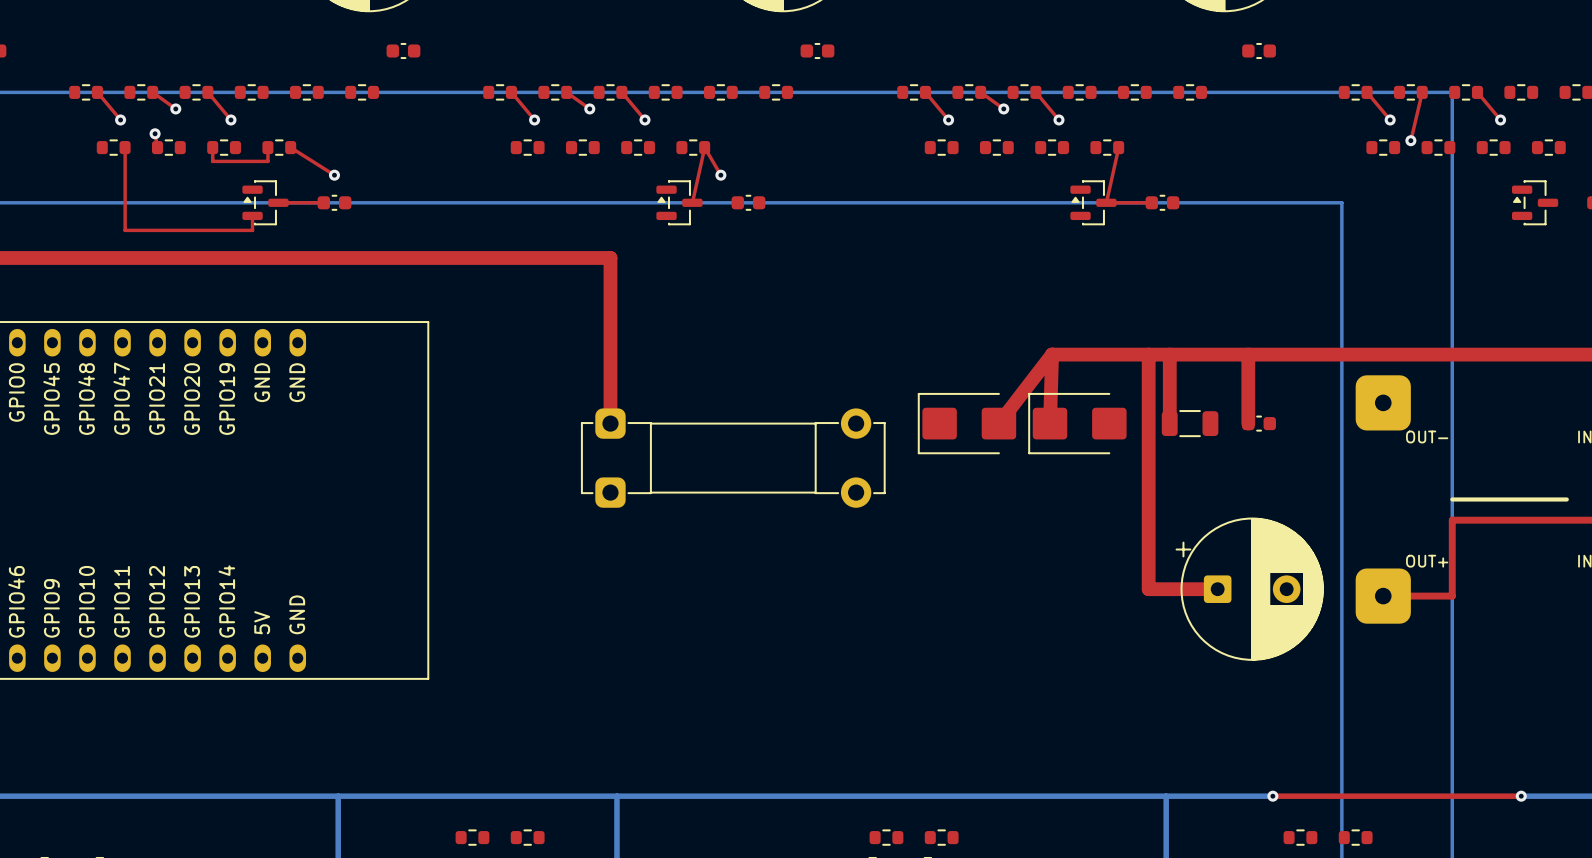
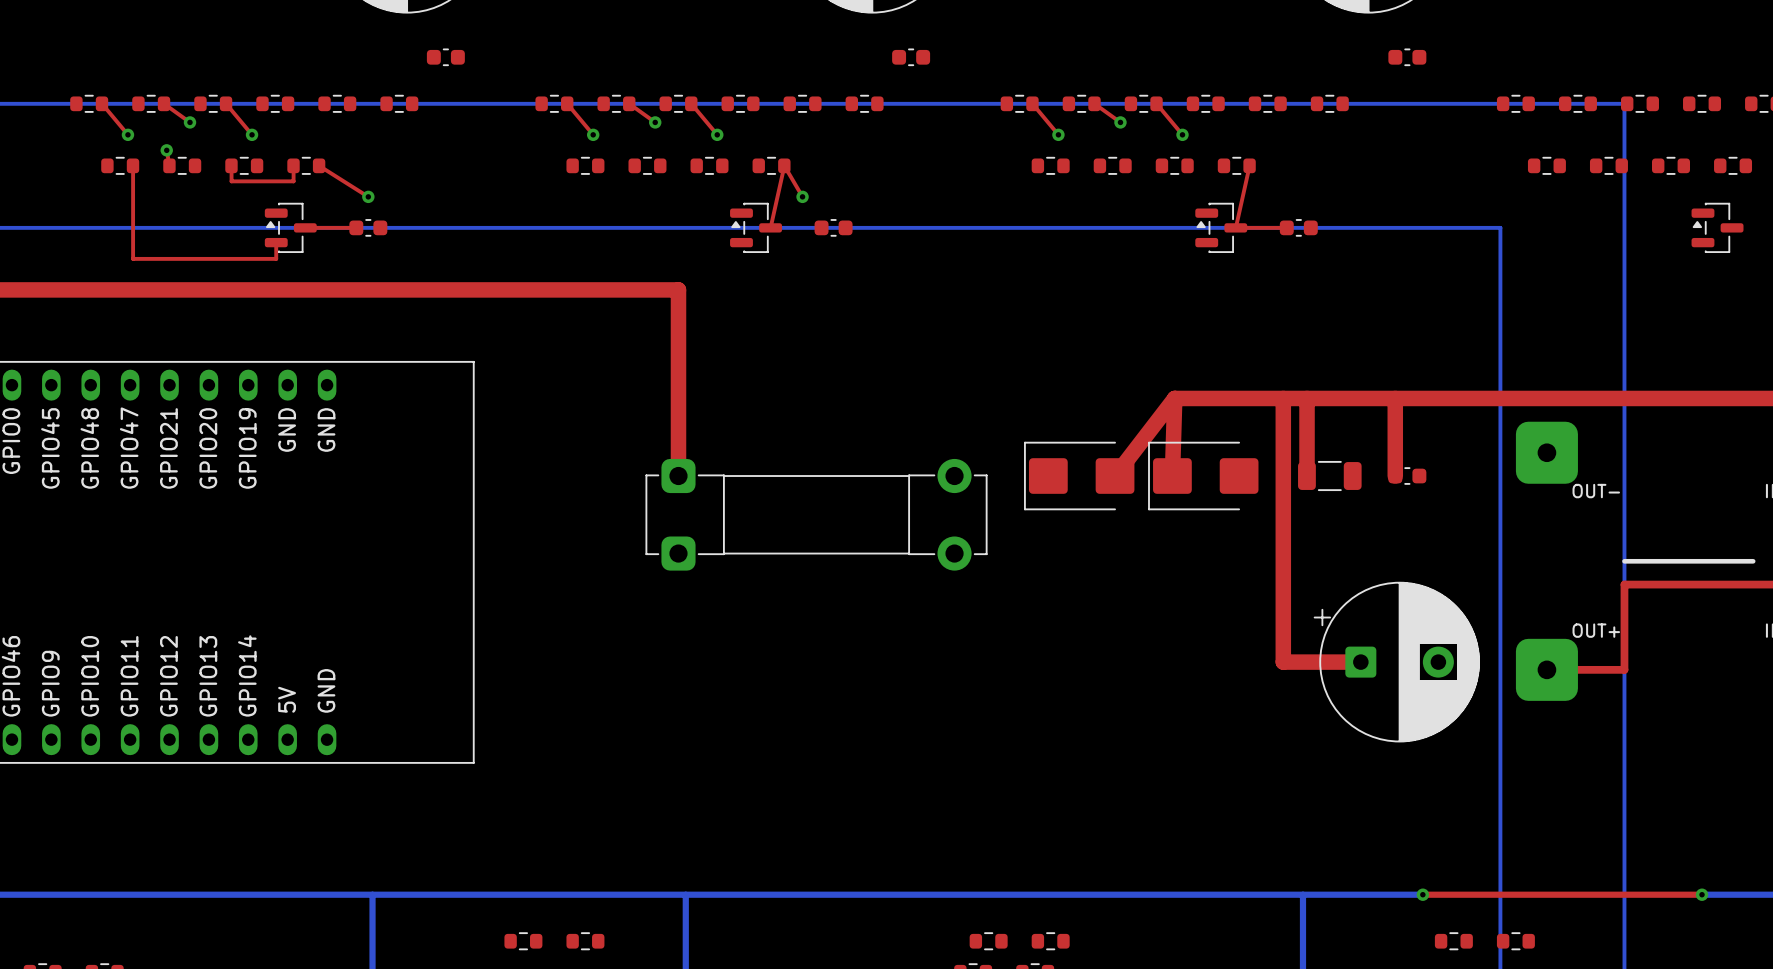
top track: (1367, 92) (1390, 119) -> none
top track: (1422, 92) (1410, 140) -> none
top track: (1477, 92) (1500, 119) -> none
via: (1390, 119) -> none
via: (1500, 119) -> none
via: (1410, 140) -> none

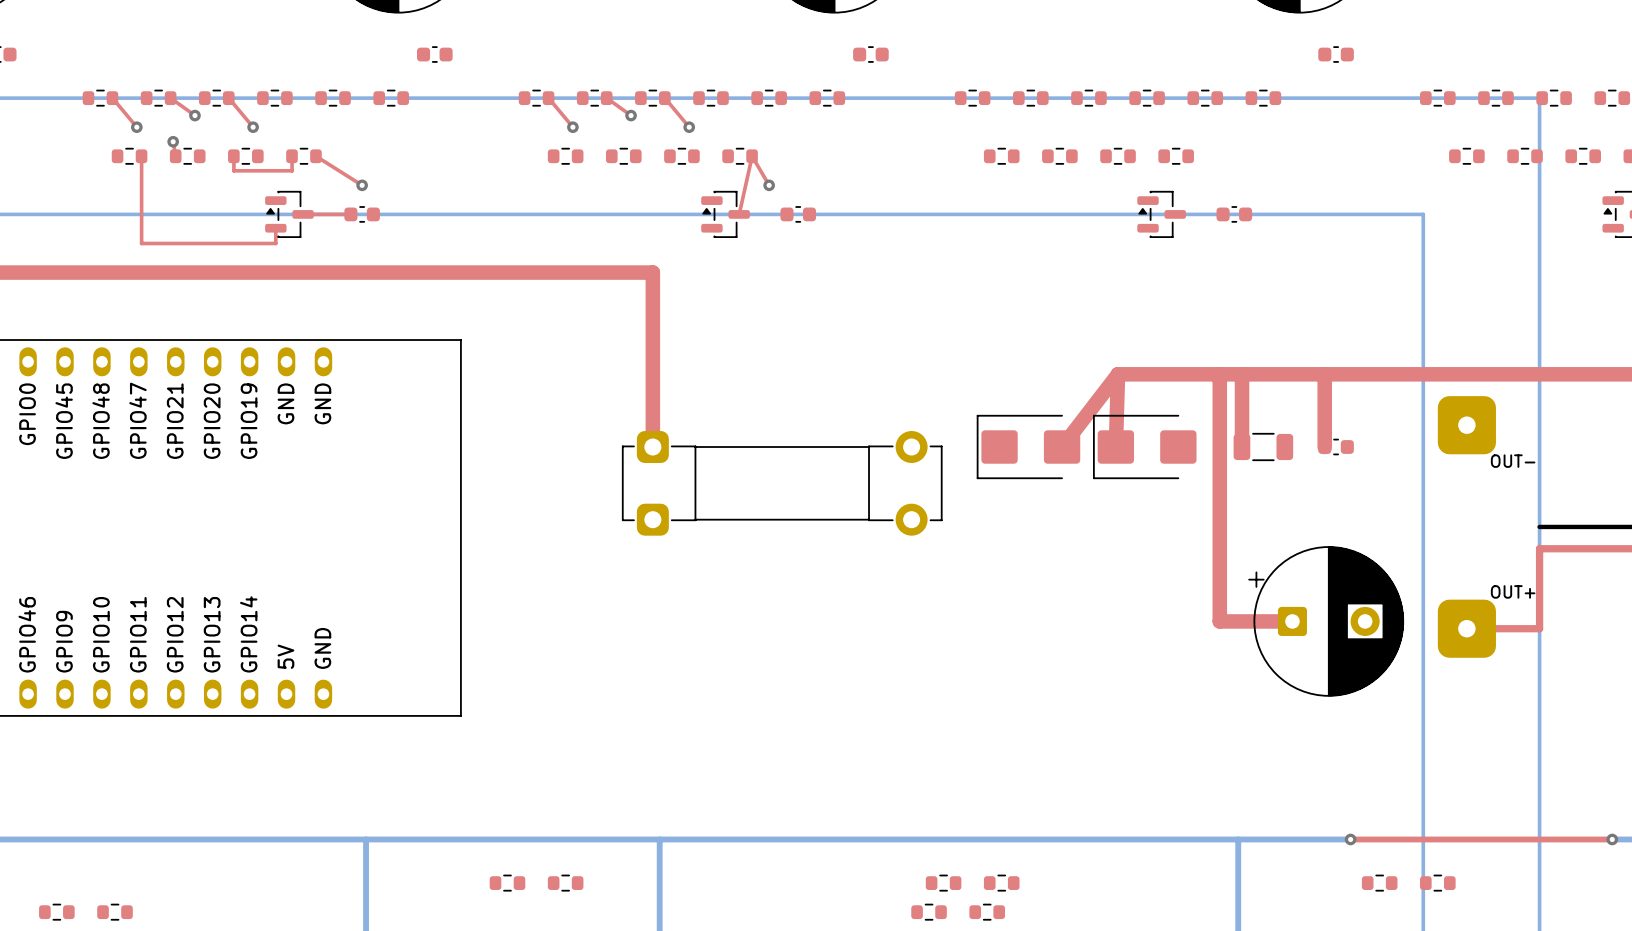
top track: (1032, 103) (1058, 134) -> none
top track: (1094, 103) (1120, 122) -> none
top track: (1156, 103) (1182, 134) -> none
via: (1120, 122) -> none
via: (1058, 134) -> none
via: (1182, 134) -> none
top track: (1249, 165) (1235, 227) (1286, 227) -> none

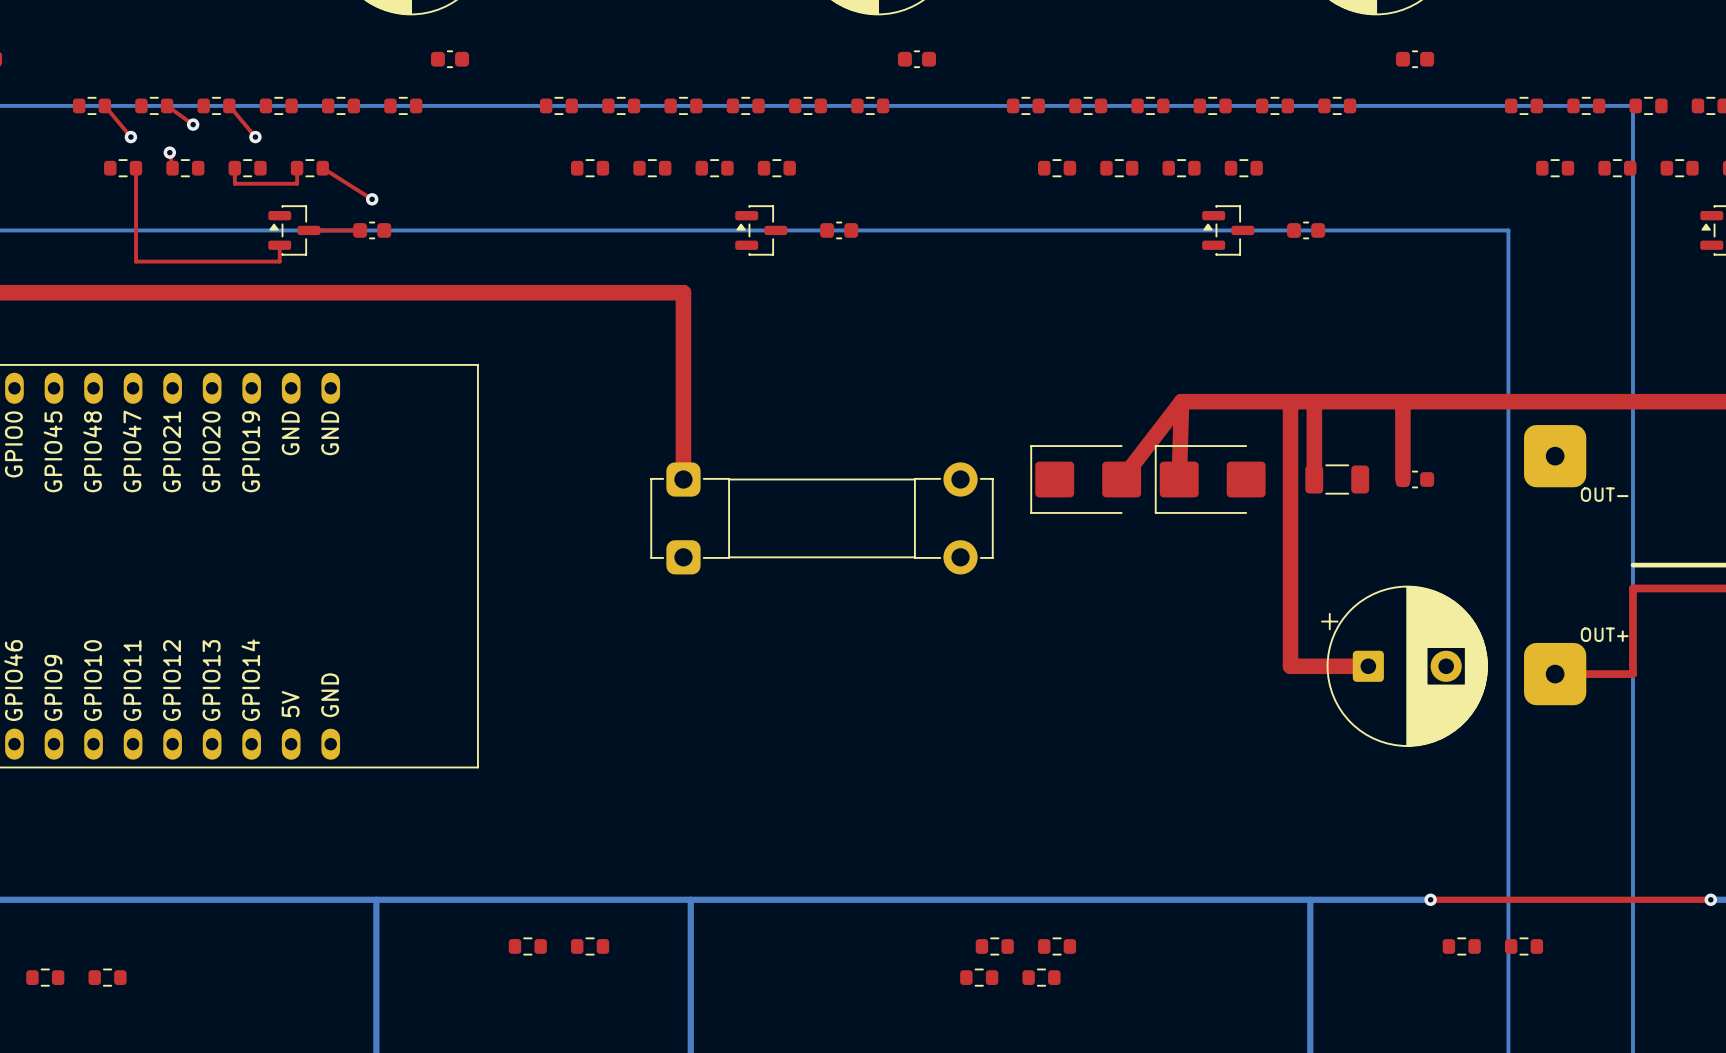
top track: (548, 98) (572, 127) -> none
top track: (606, 98) (631, 115) -> none
top track: (664, 98) (689, 127) -> none
via: (631, 115) -> none
via: (572, 127) -> none
via: (689, 127) -> none
top track: (769, 185) (752, 156) (739, 214) -> none
via: (769, 185) -> none

